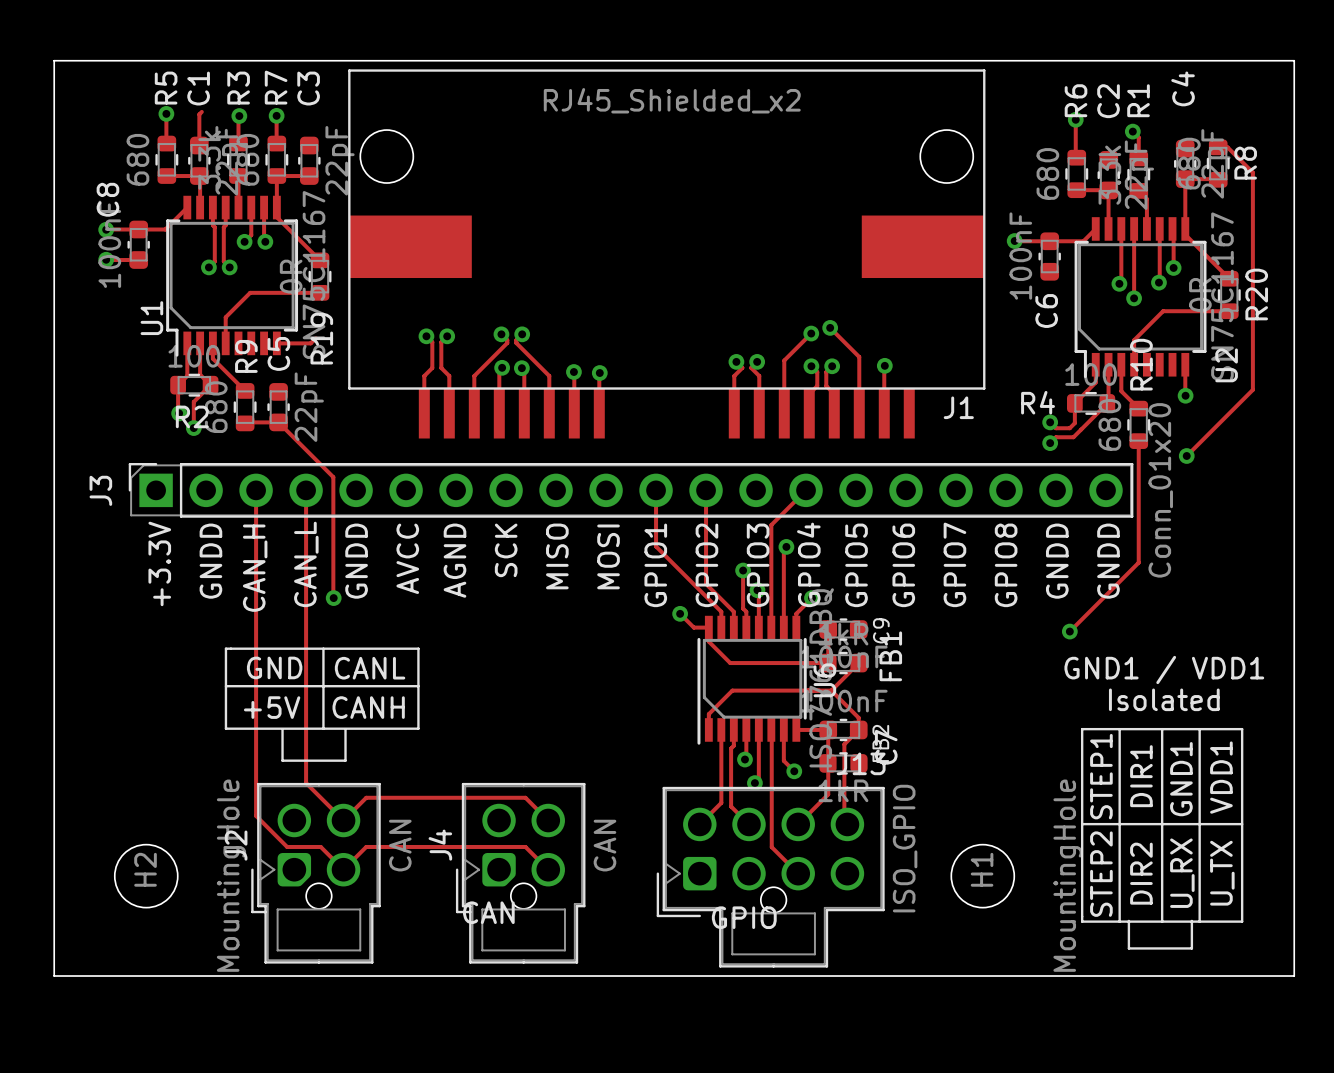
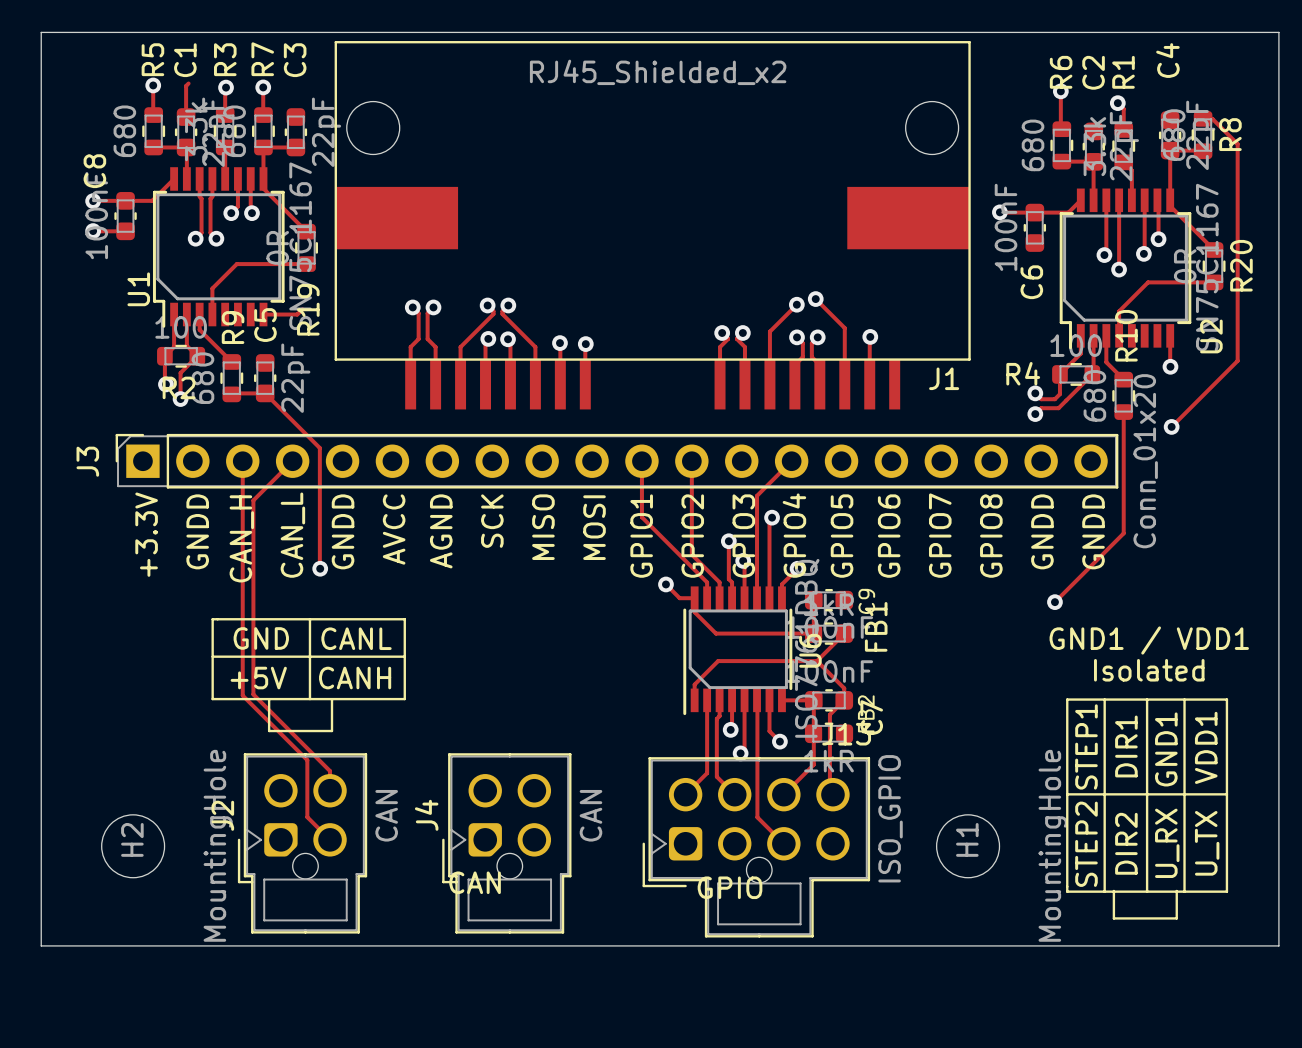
track: (306, 490) (306, 783) (343, 820) (366, 797) (525, 797) (548, 820) -> (292, 461) (253, 500) (253, 694) (330, 771) (330, 790)
track: (256, 725) (256, 815) (287, 846) (320, 846) -> (242, 695) (307, 760) (307, 817)
track: (343, 869) (366, 846) (525, 846) (548, 869) -> none

